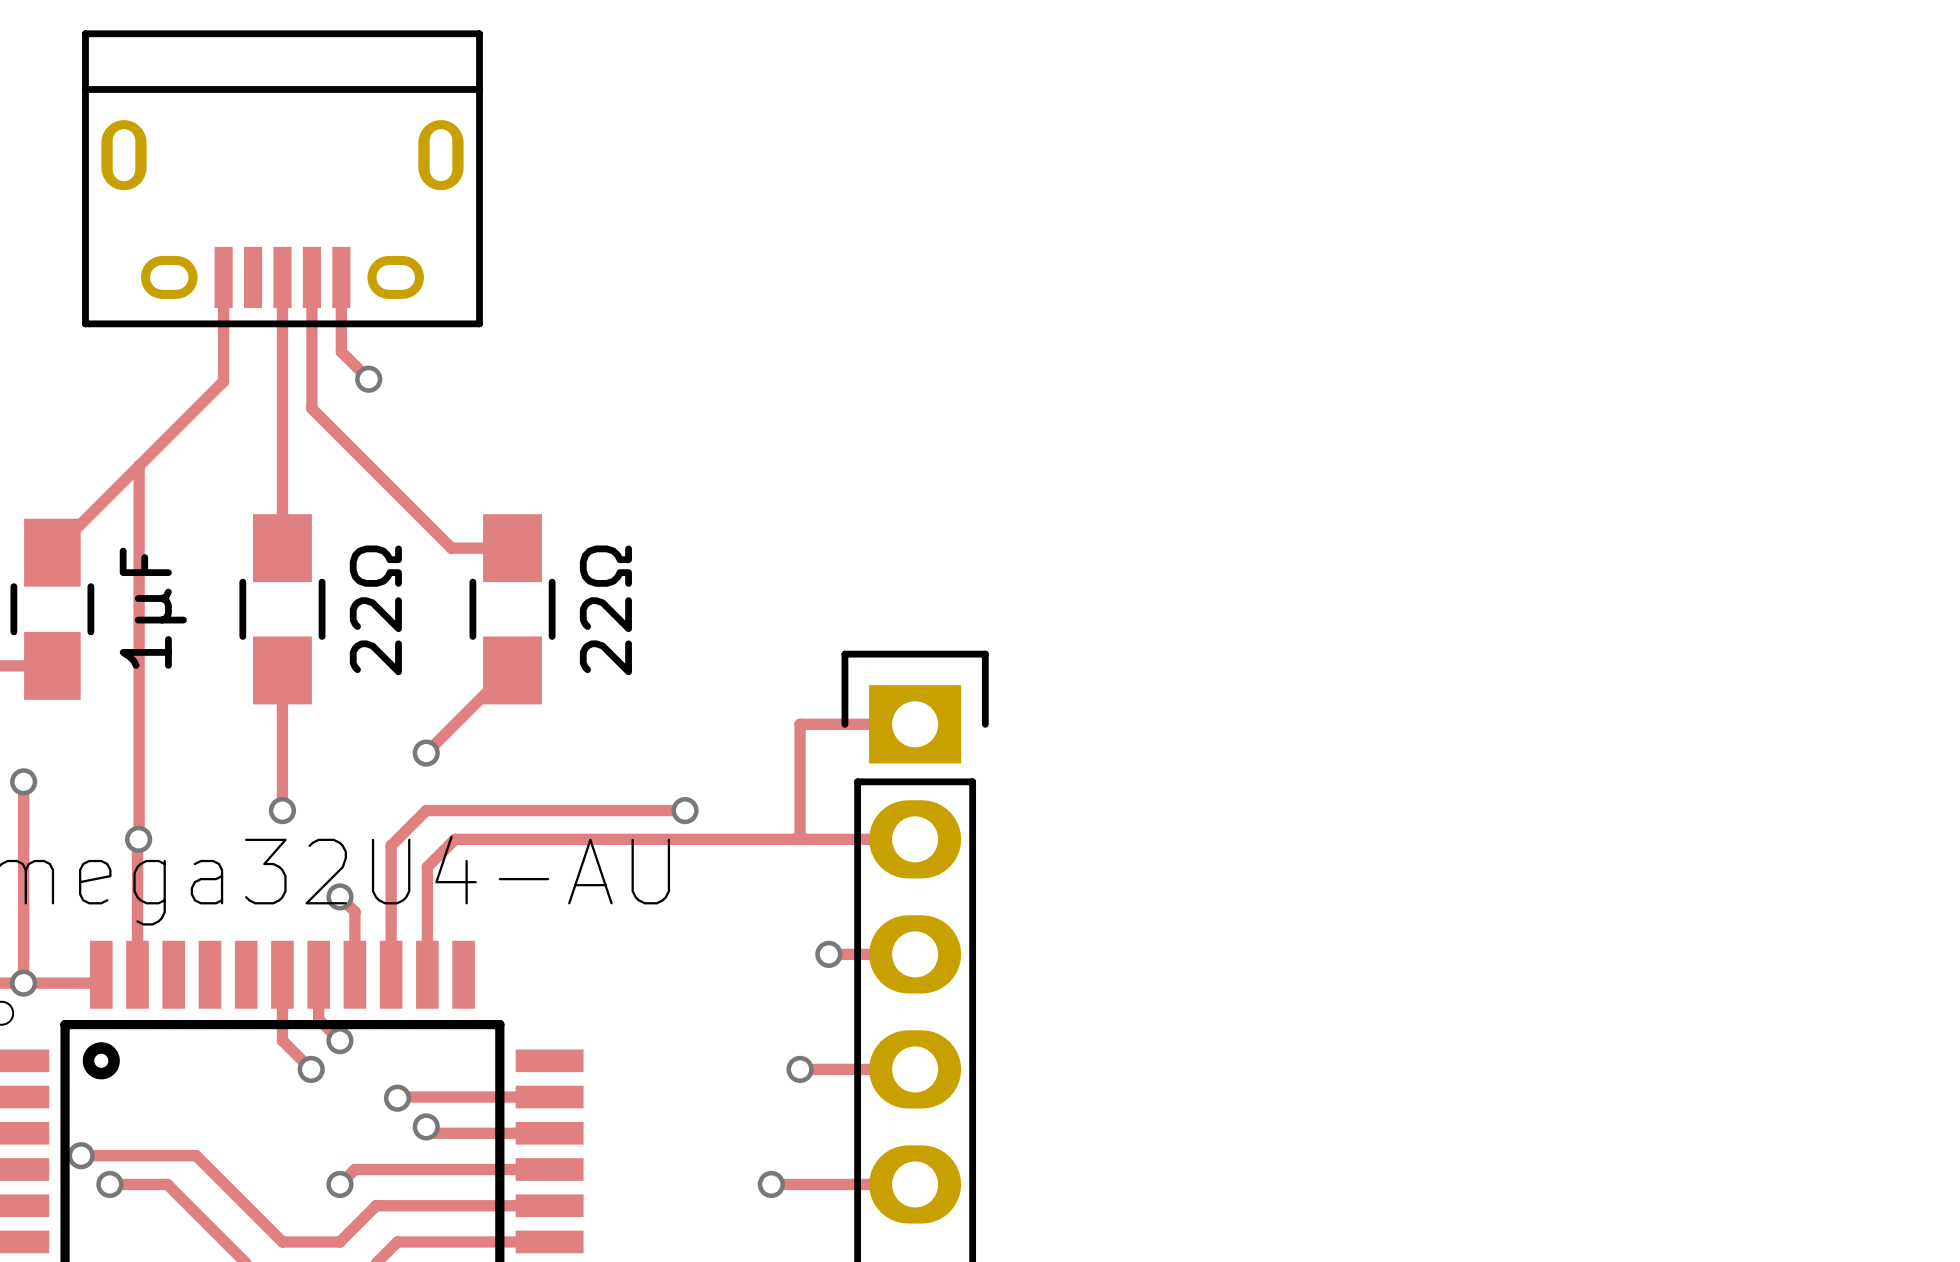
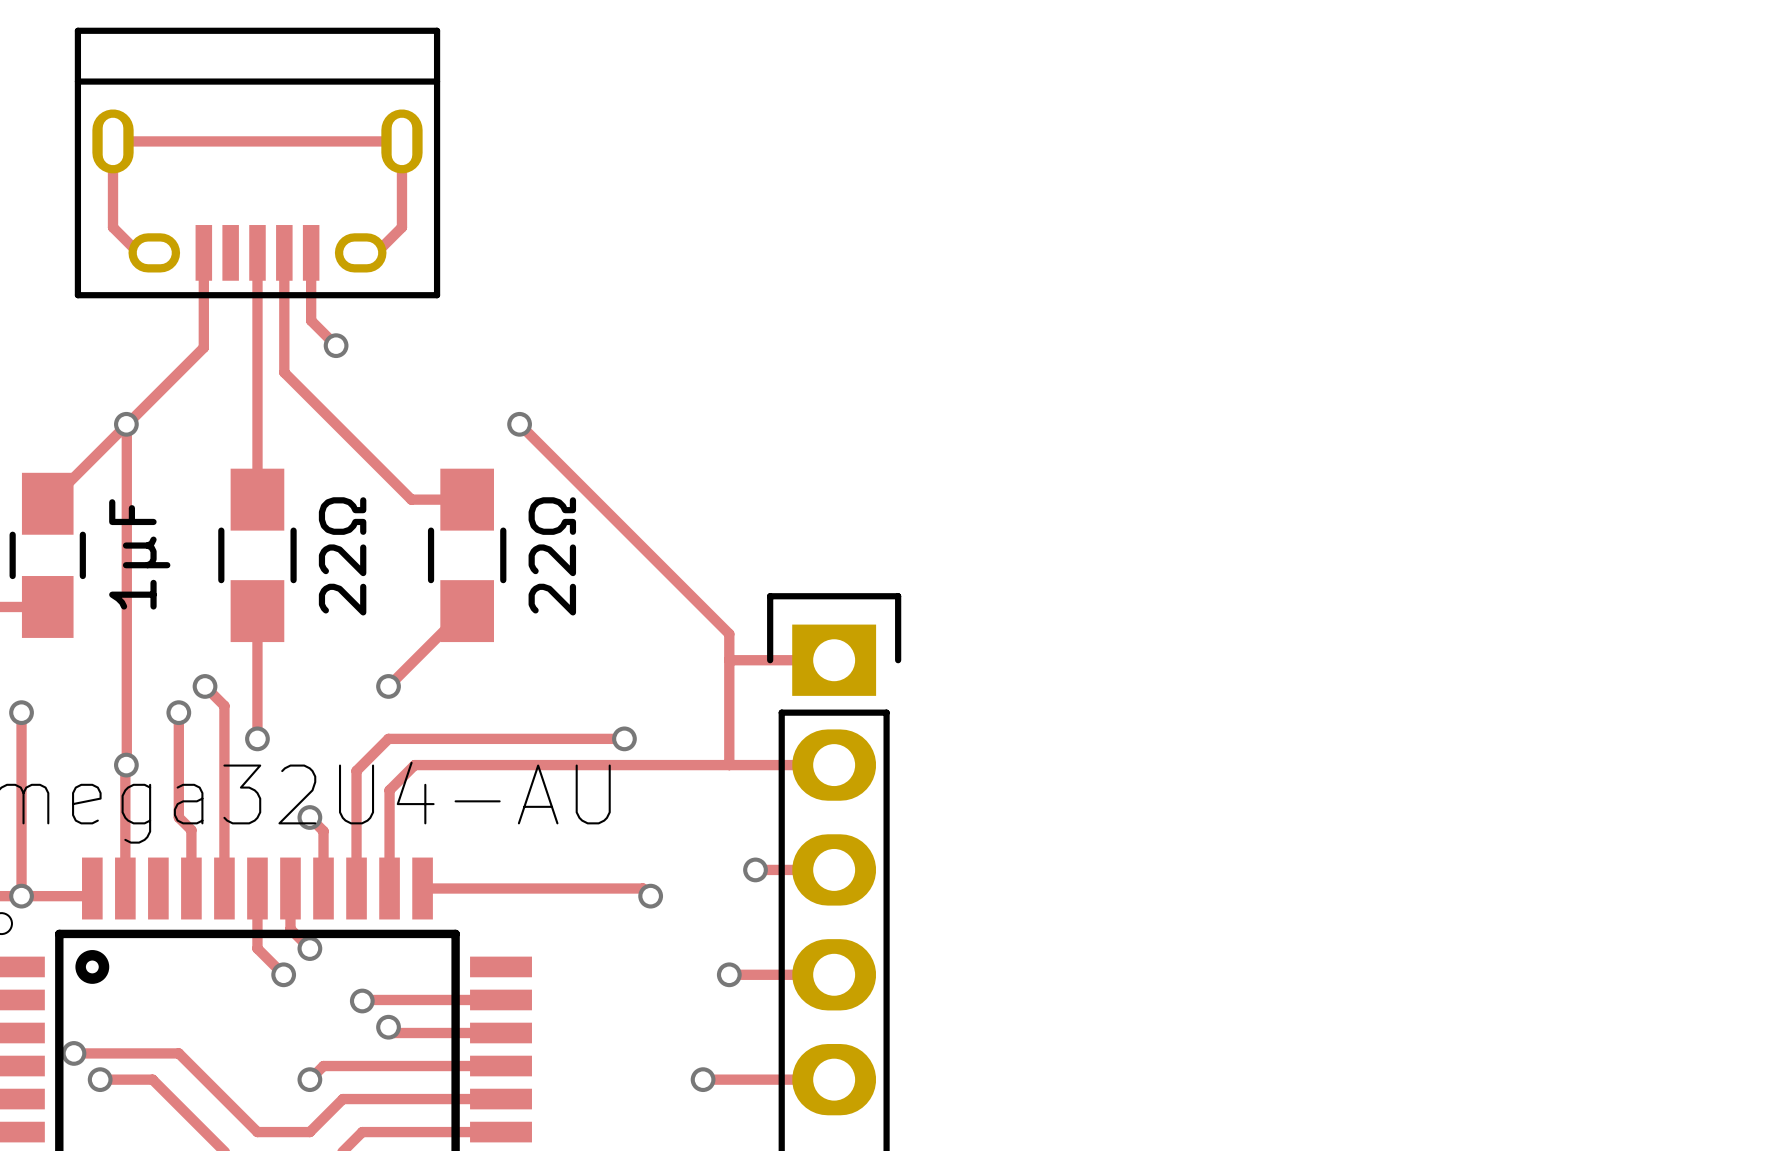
track: none -> (154, 252) (138, 252) (113, 227) (113, 141) (401, 141) (401, 227) (376, 252) (360, 252)
via: none -> (126, 424)
track: none -> (519, 424) (729, 634) (729, 660)
via: none -> (519, 424)
track: none -> (205, 686) (224, 705) (224, 888)
via: none -> (205, 686)
track: none -> (178, 712) (178, 817) (191, 830) (191, 888)
via: none -> (178, 712)
track: none -> (422, 888) (643, 888) (650, 896)
via: none -> (650, 896)

